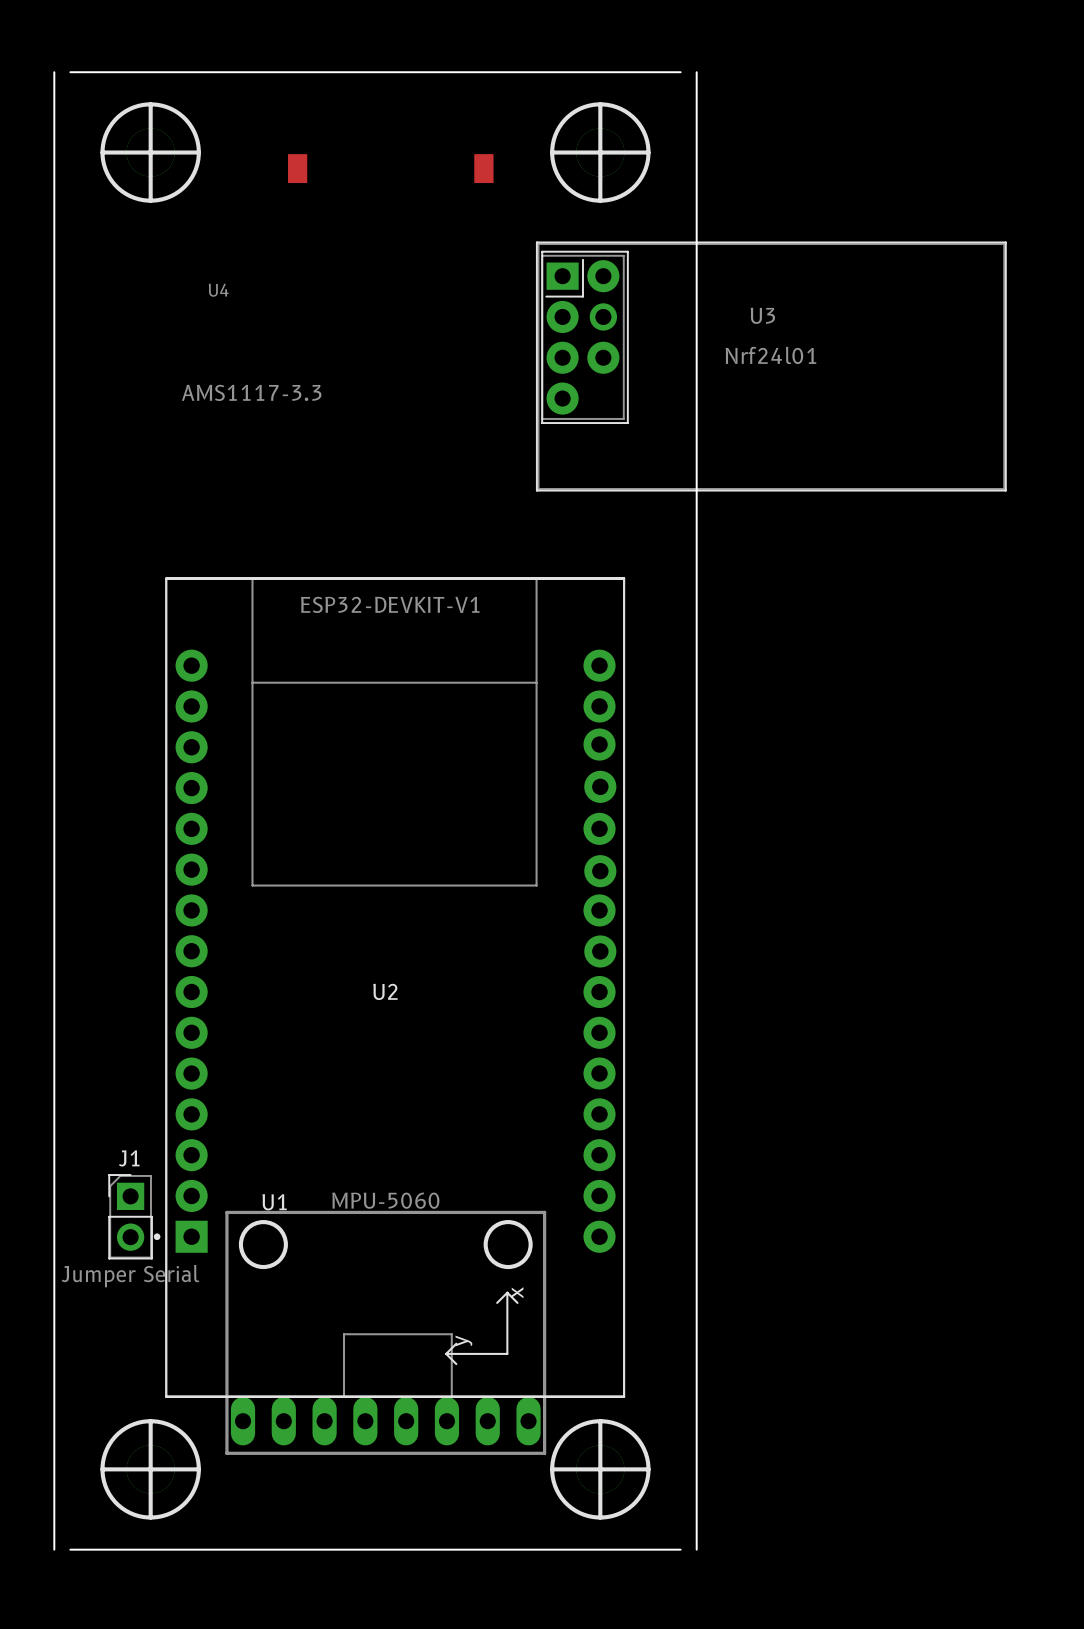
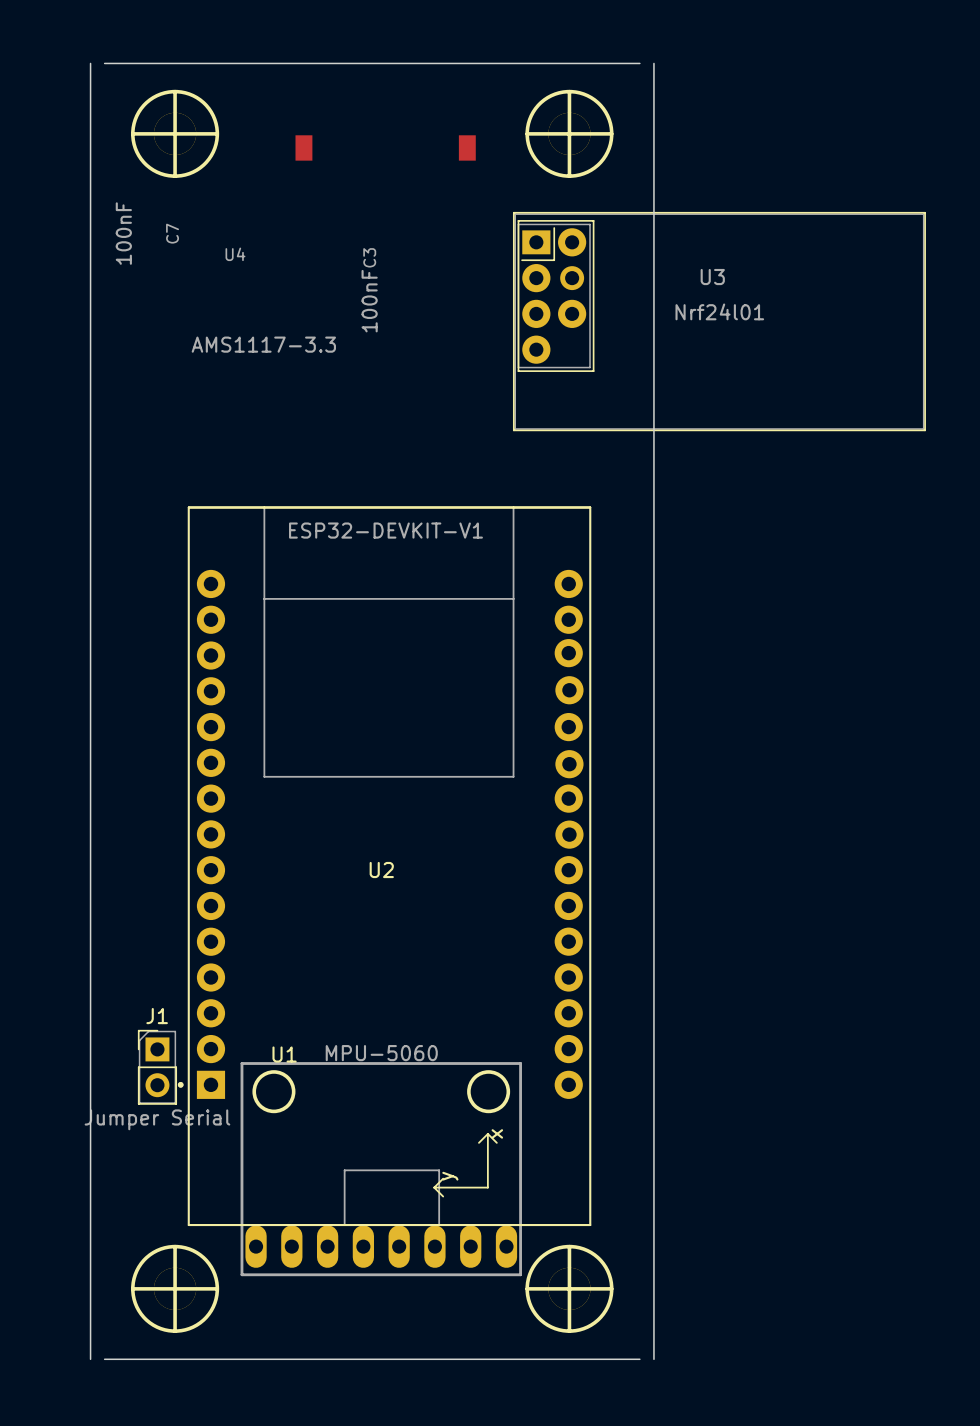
C7: none -> 100nF (147, 233)
C3: none -> 100nF (369, 290)

